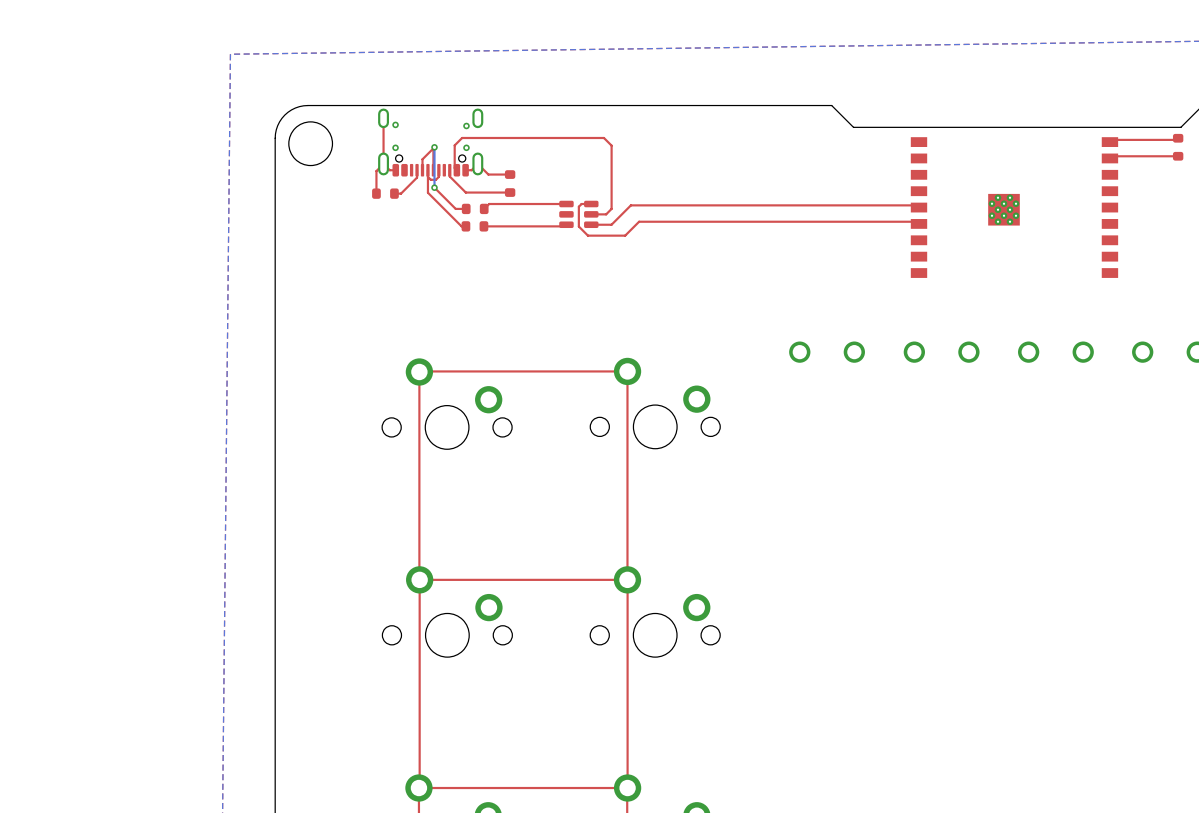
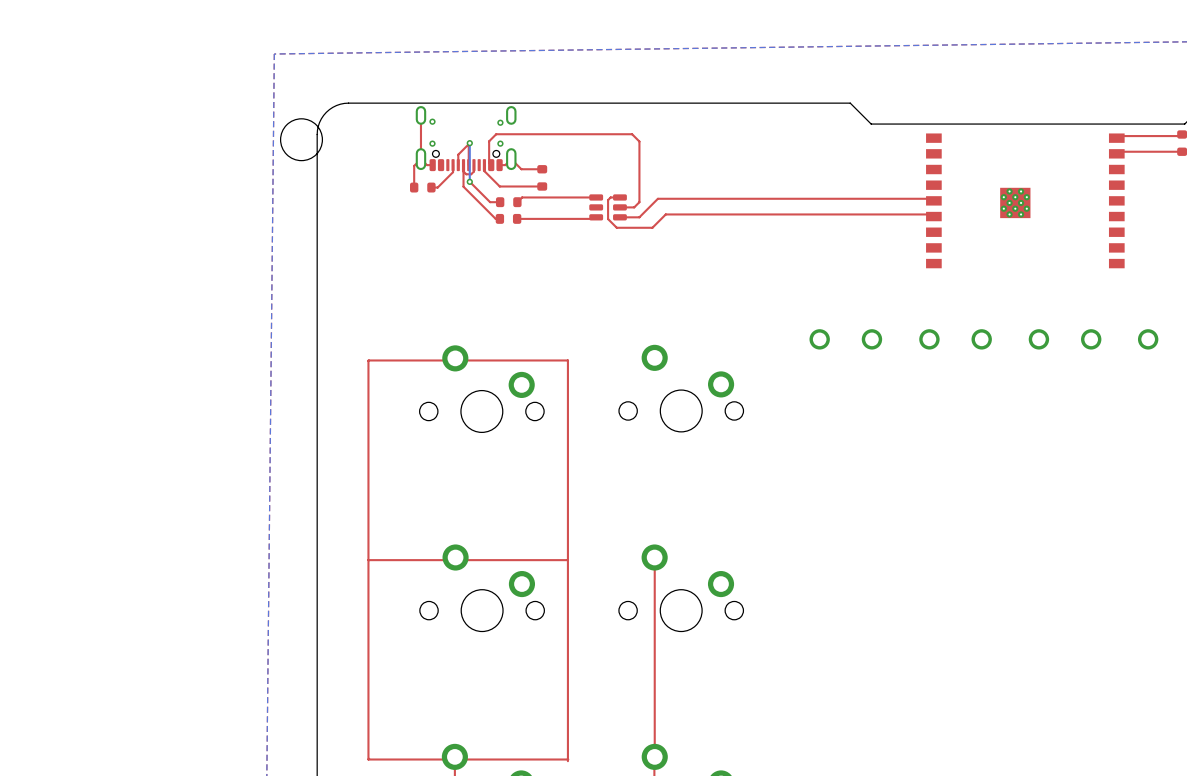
round board edge position: (310, 143) -> (301, 139)
top track: (627, 371) (419, 371) (419, 579) -> none
top track: (627, 371) (627, 579) (419, 579) -> none
top track: none -> (368, 360) (368, 560)
top track: none -> (567, 360) (567, 761)
top track: none -> (567, 360) (368, 360)
top track: (419, 579) (418, 788) (627, 788) -> none
top track: none -> (567, 560) (368, 560) (368, 758)
top track: none -> (369, 758) (568, 759)

